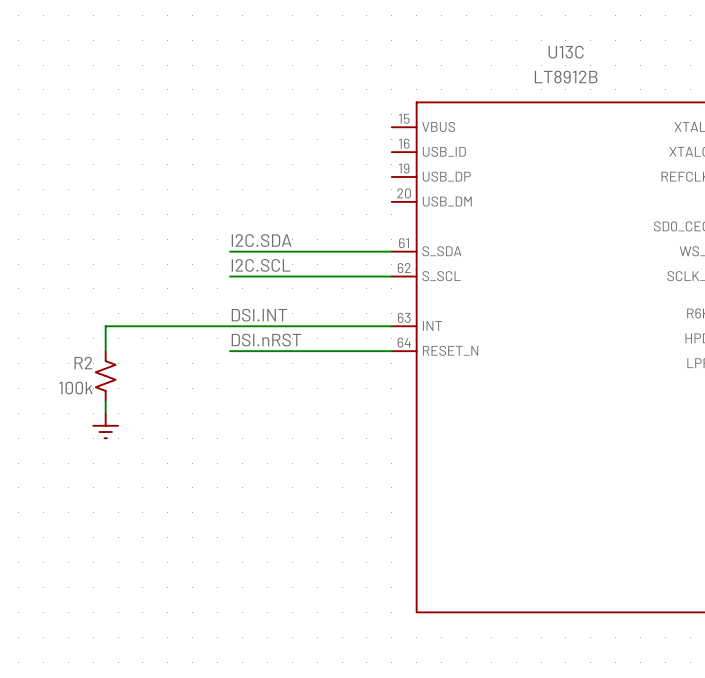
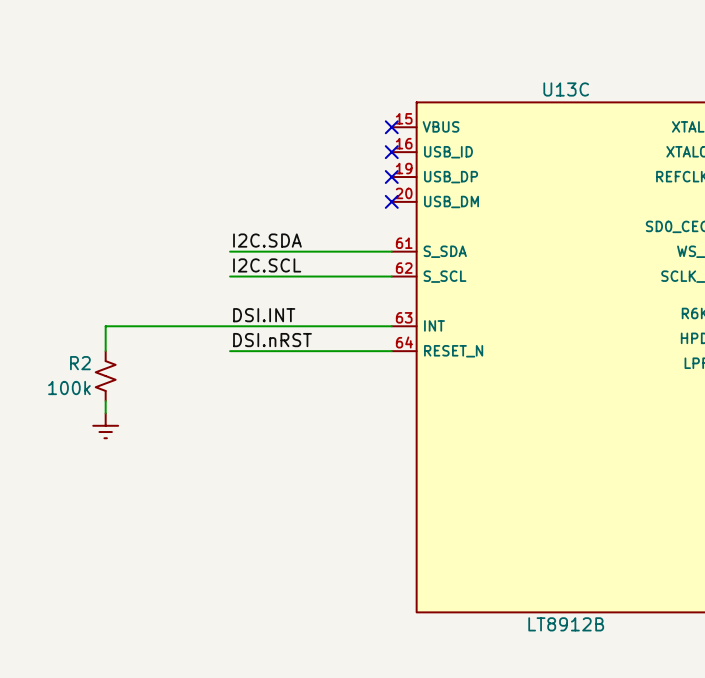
U13C name position: U13C (566, 52) -> U13C (566, 89)
U13C value position: LT8912B (566, 77) -> LT8912B (566, 624)
no-connect mark: none -> (391, 127)
no-connect mark: none -> (391, 152)
no-connect mark: none -> (391, 177)
no-connect mark: none -> (391, 201)

